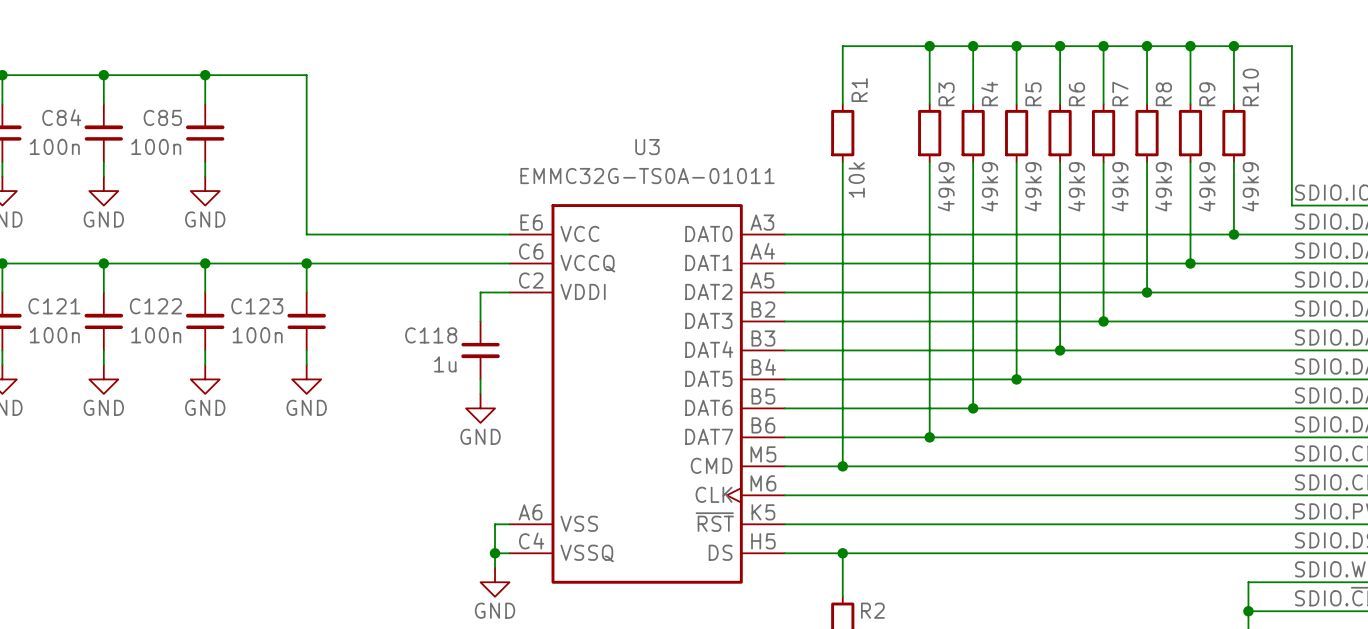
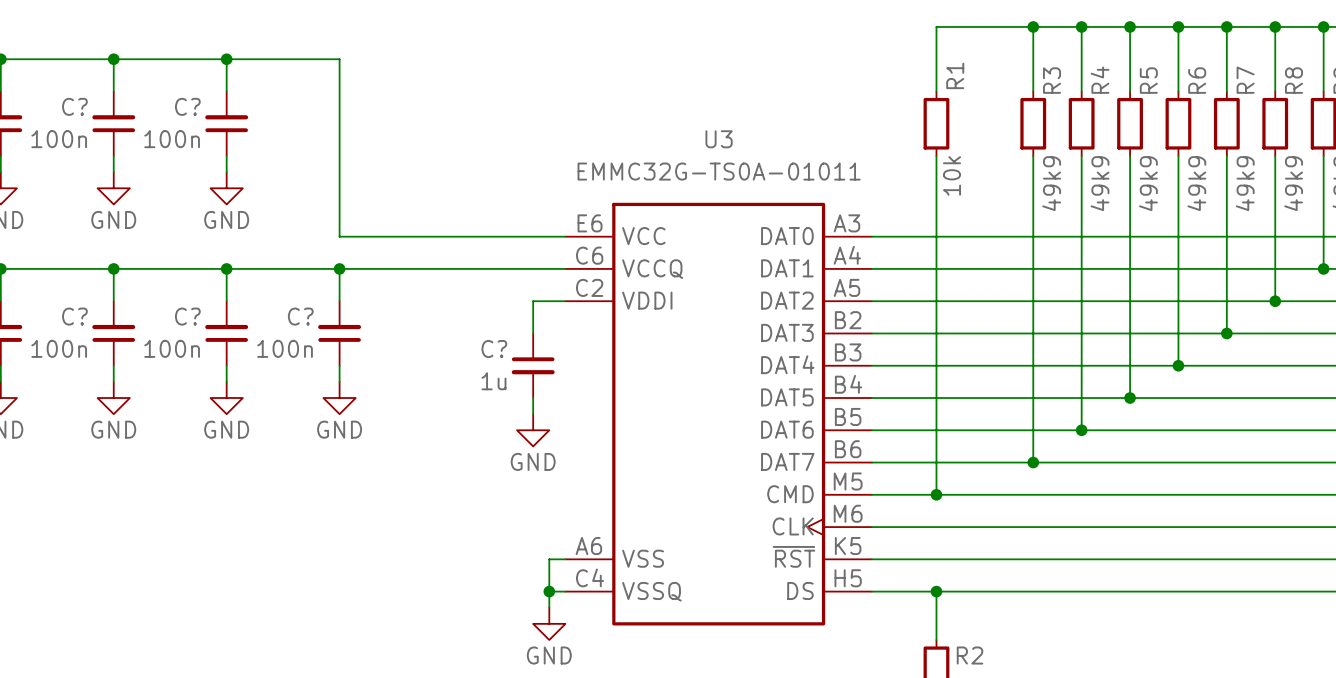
C84 name: C84 (61, 117) -> C? (74, 106)
C85 name: C85 (162, 117) -> C? (187, 106)
C121 name: C121 (54, 306) -> C? (74, 316)
C122 name: C122 (155, 306) -> C? (187, 316)
C123 name: C123 (257, 306) -> C? (300, 316)
C118 name: C118 (431, 335) -> C? (494, 349)

